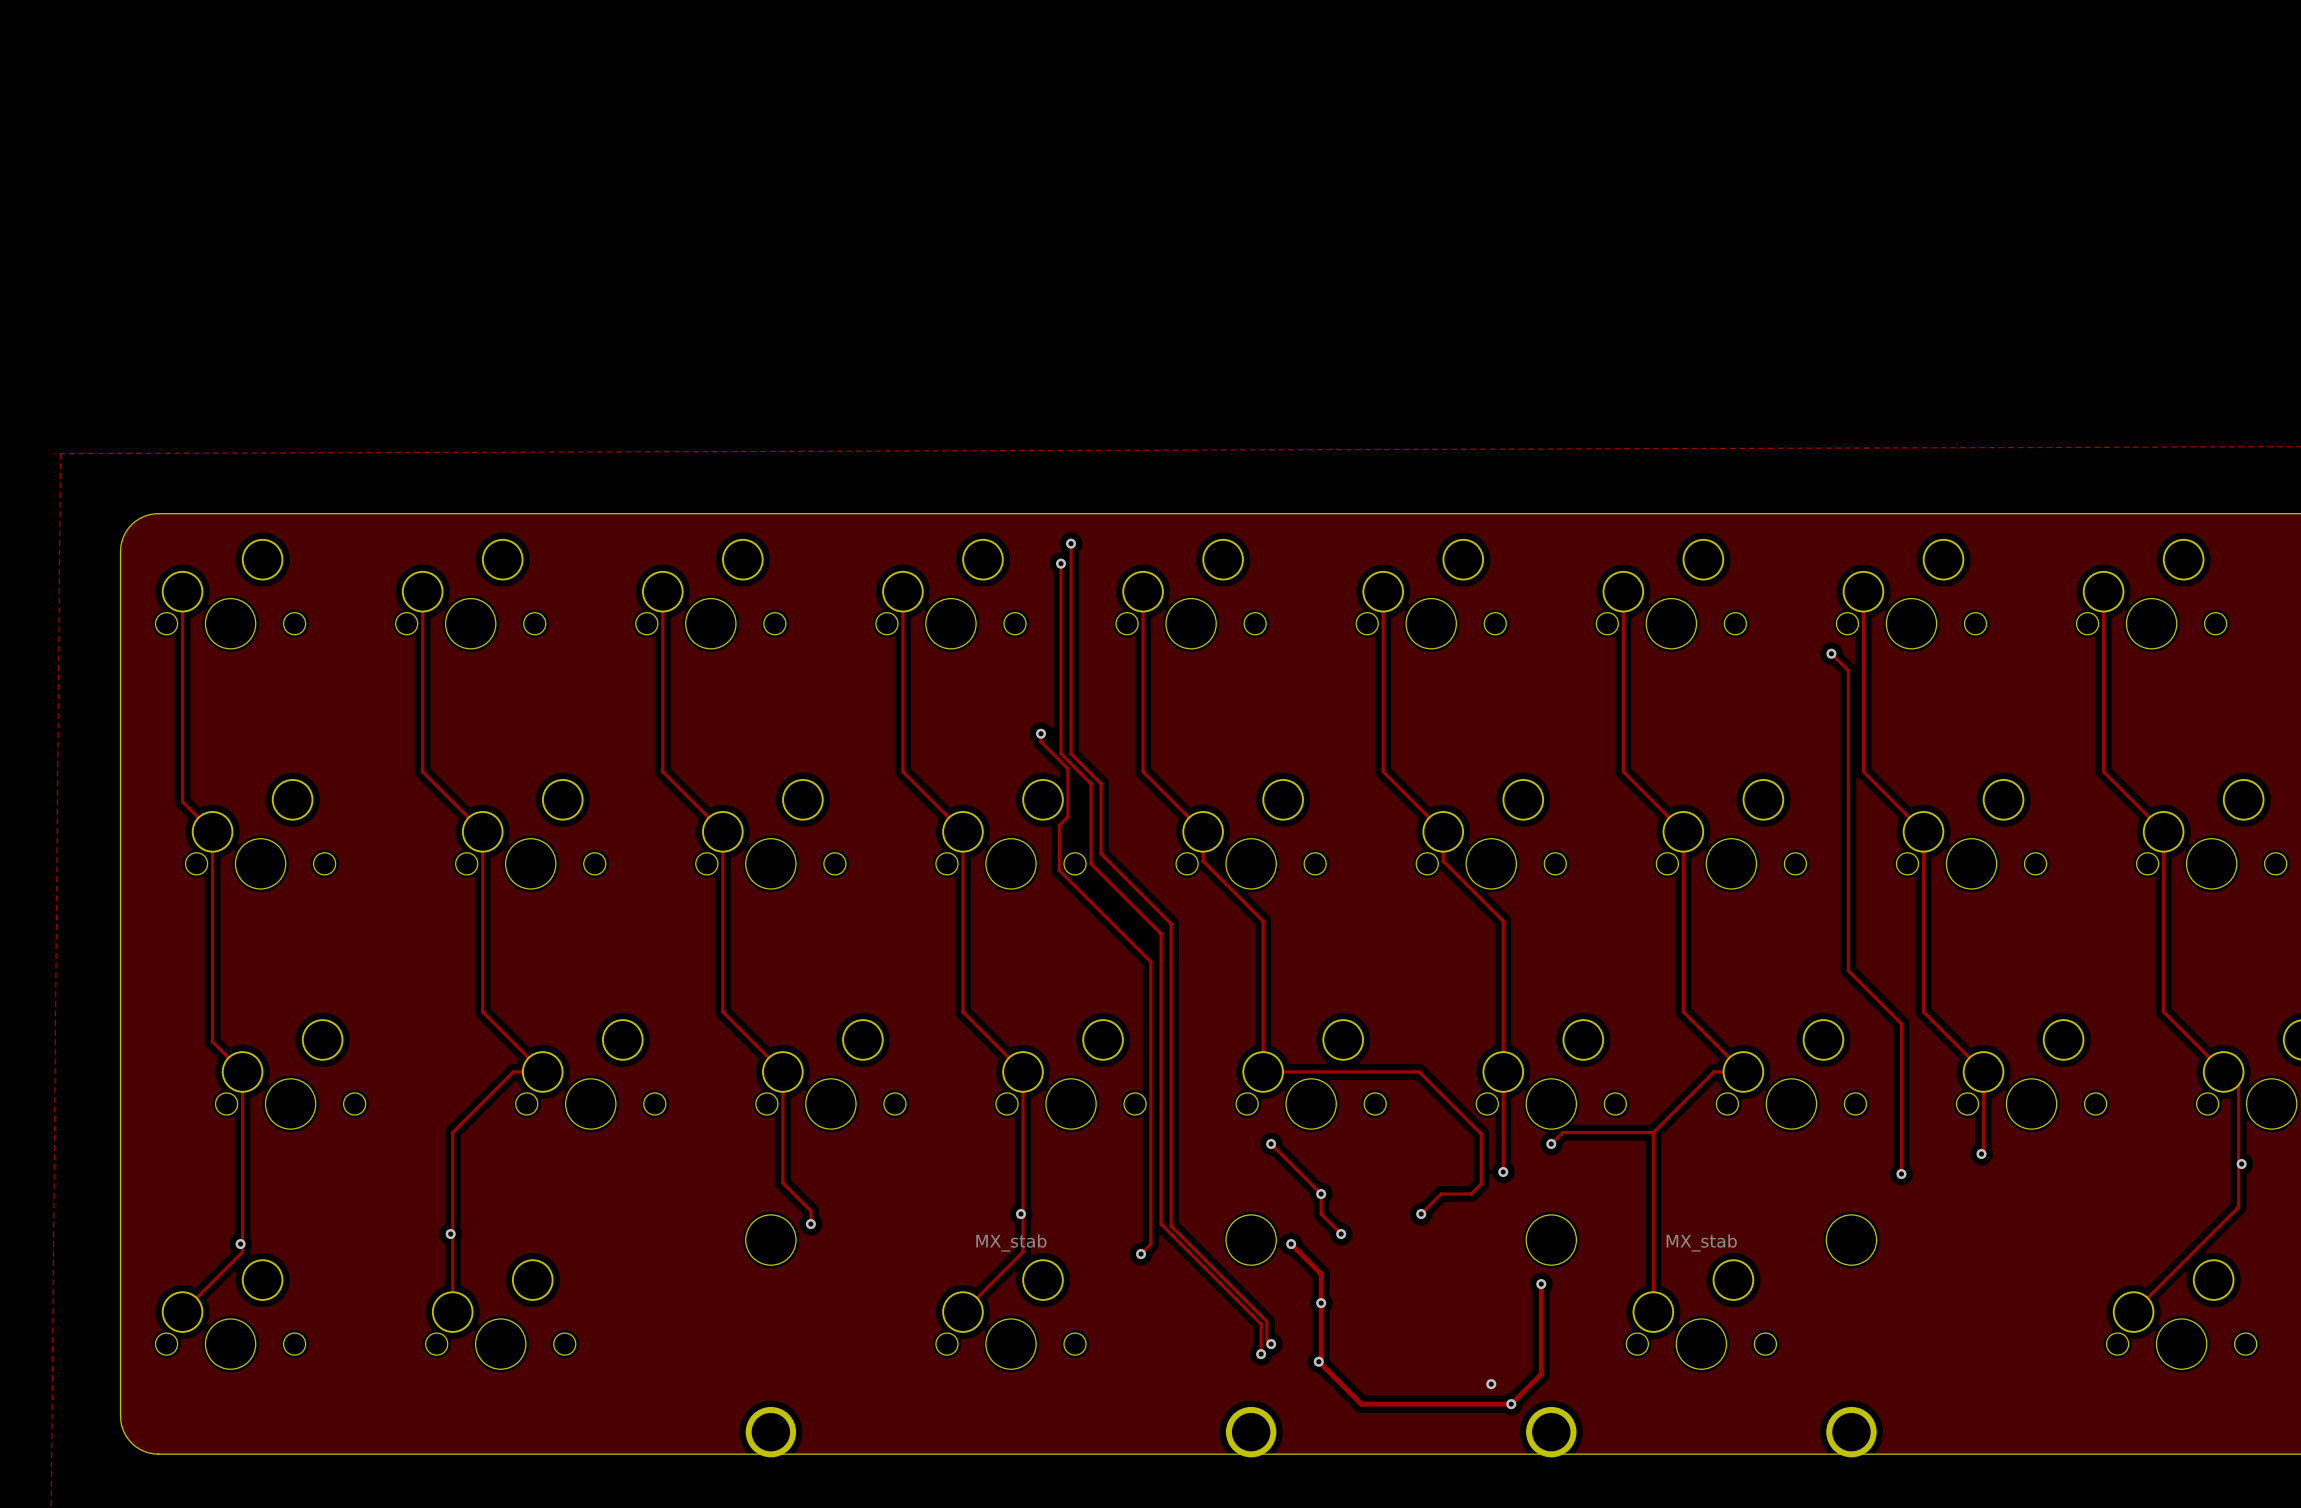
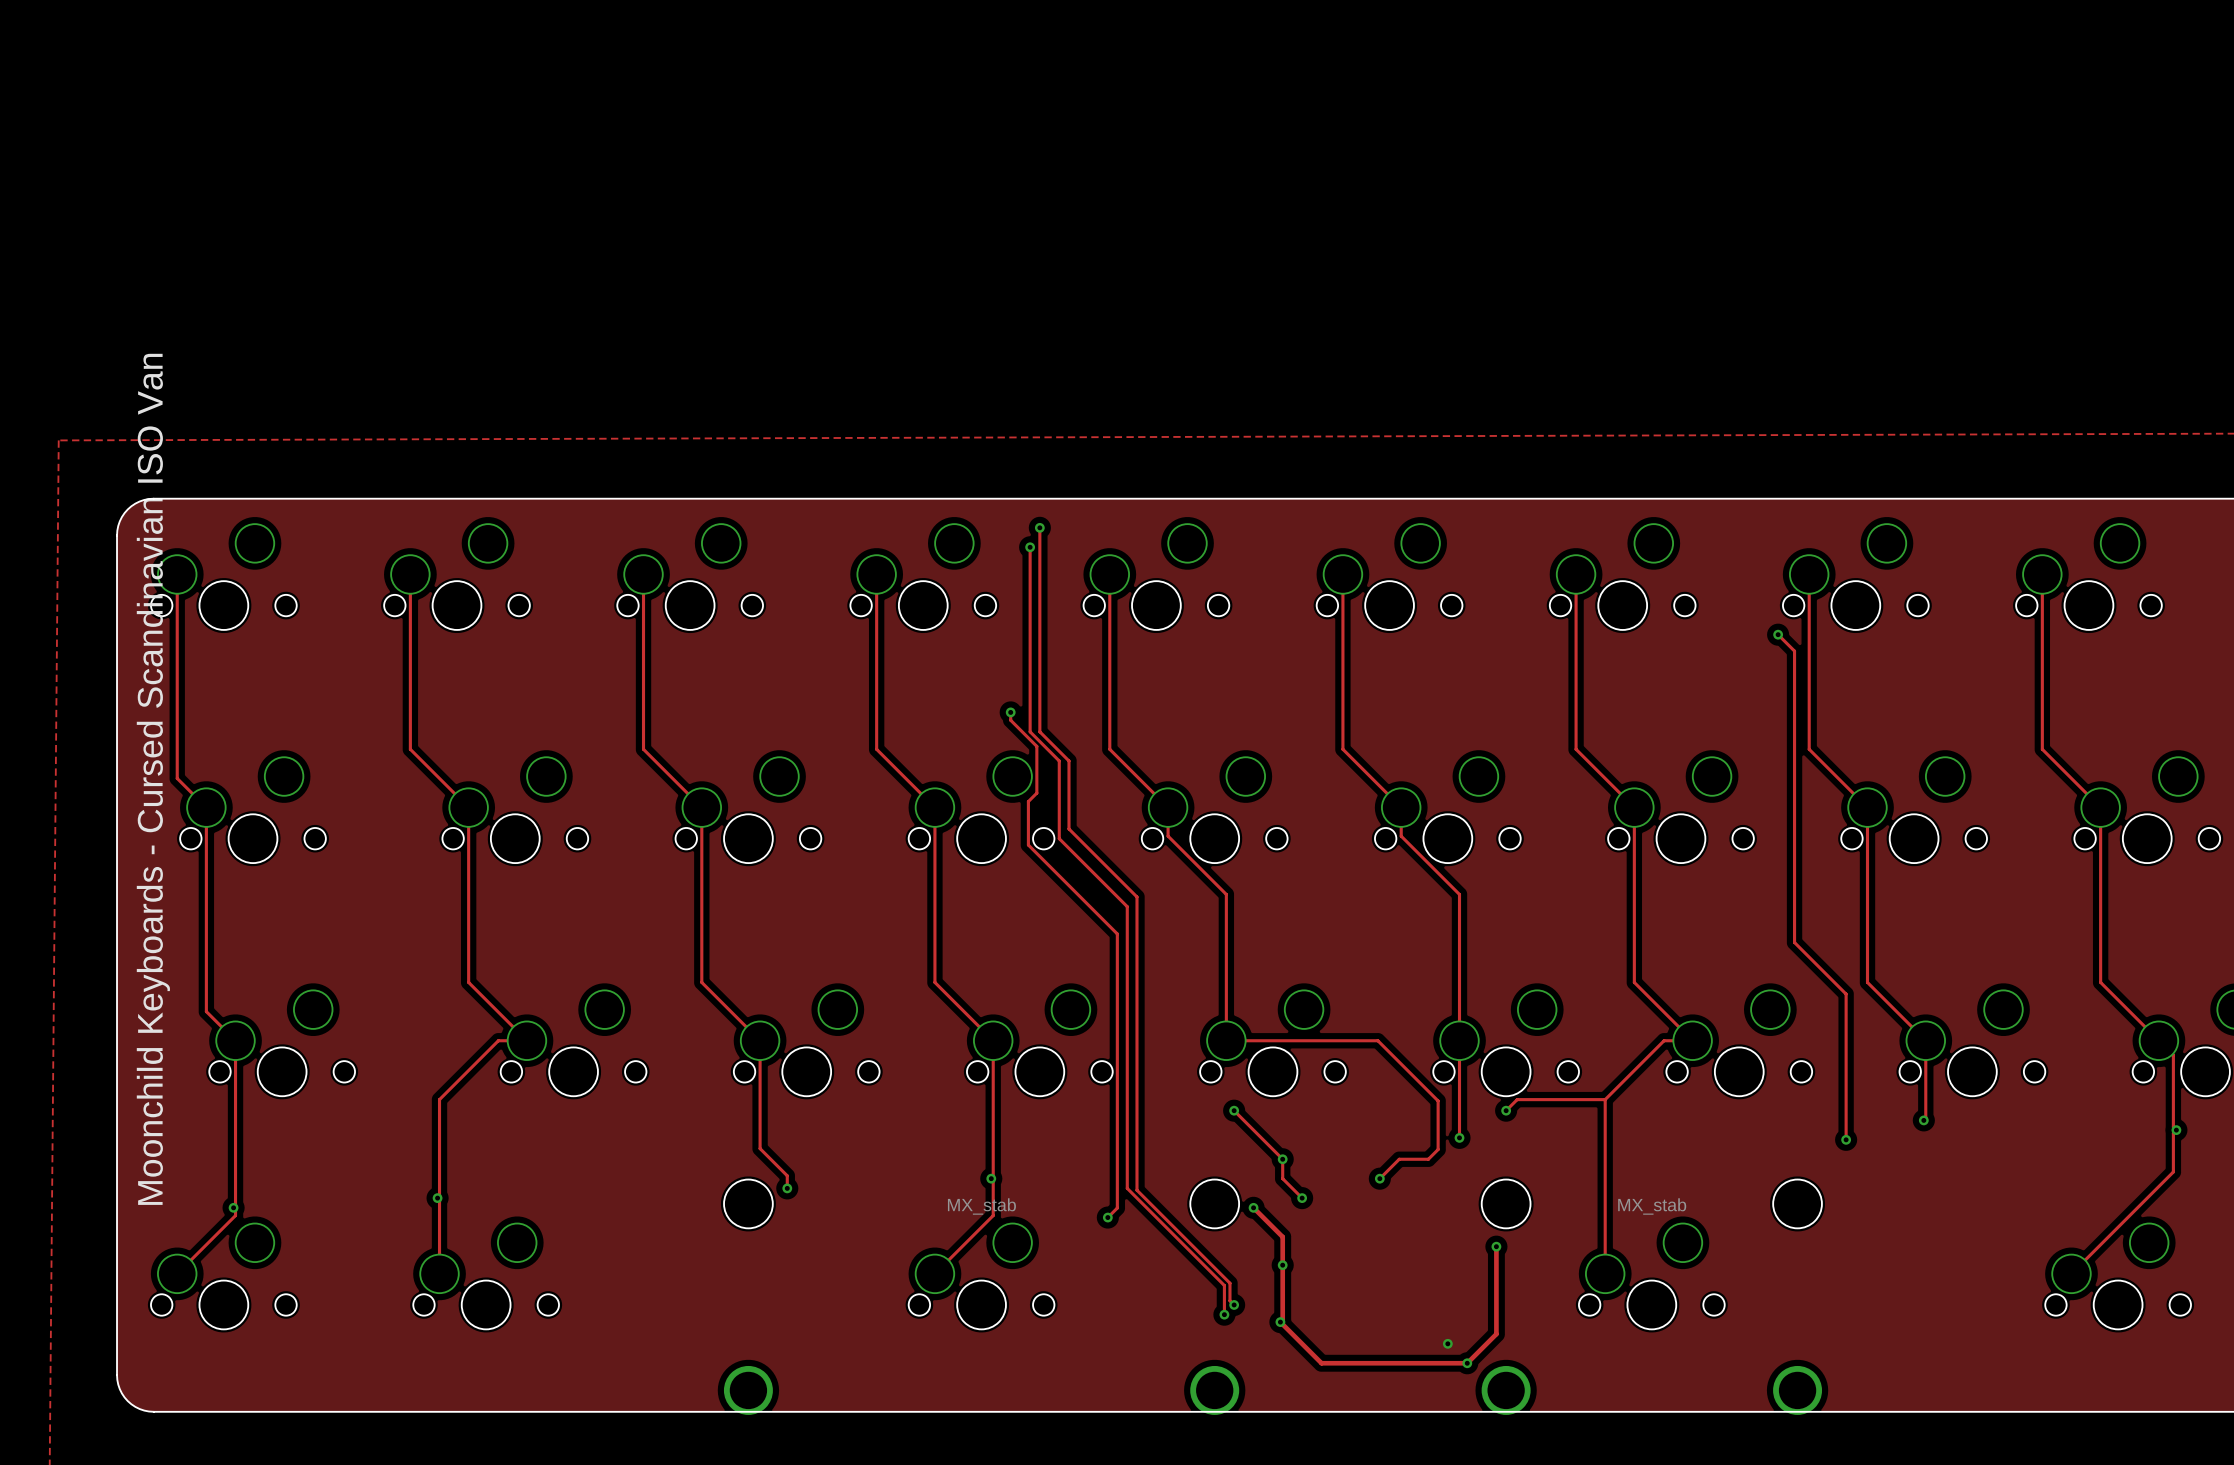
text: none -> Moonchild Keyboards - Cursed Scandinavian ISO Van (153, 779)

